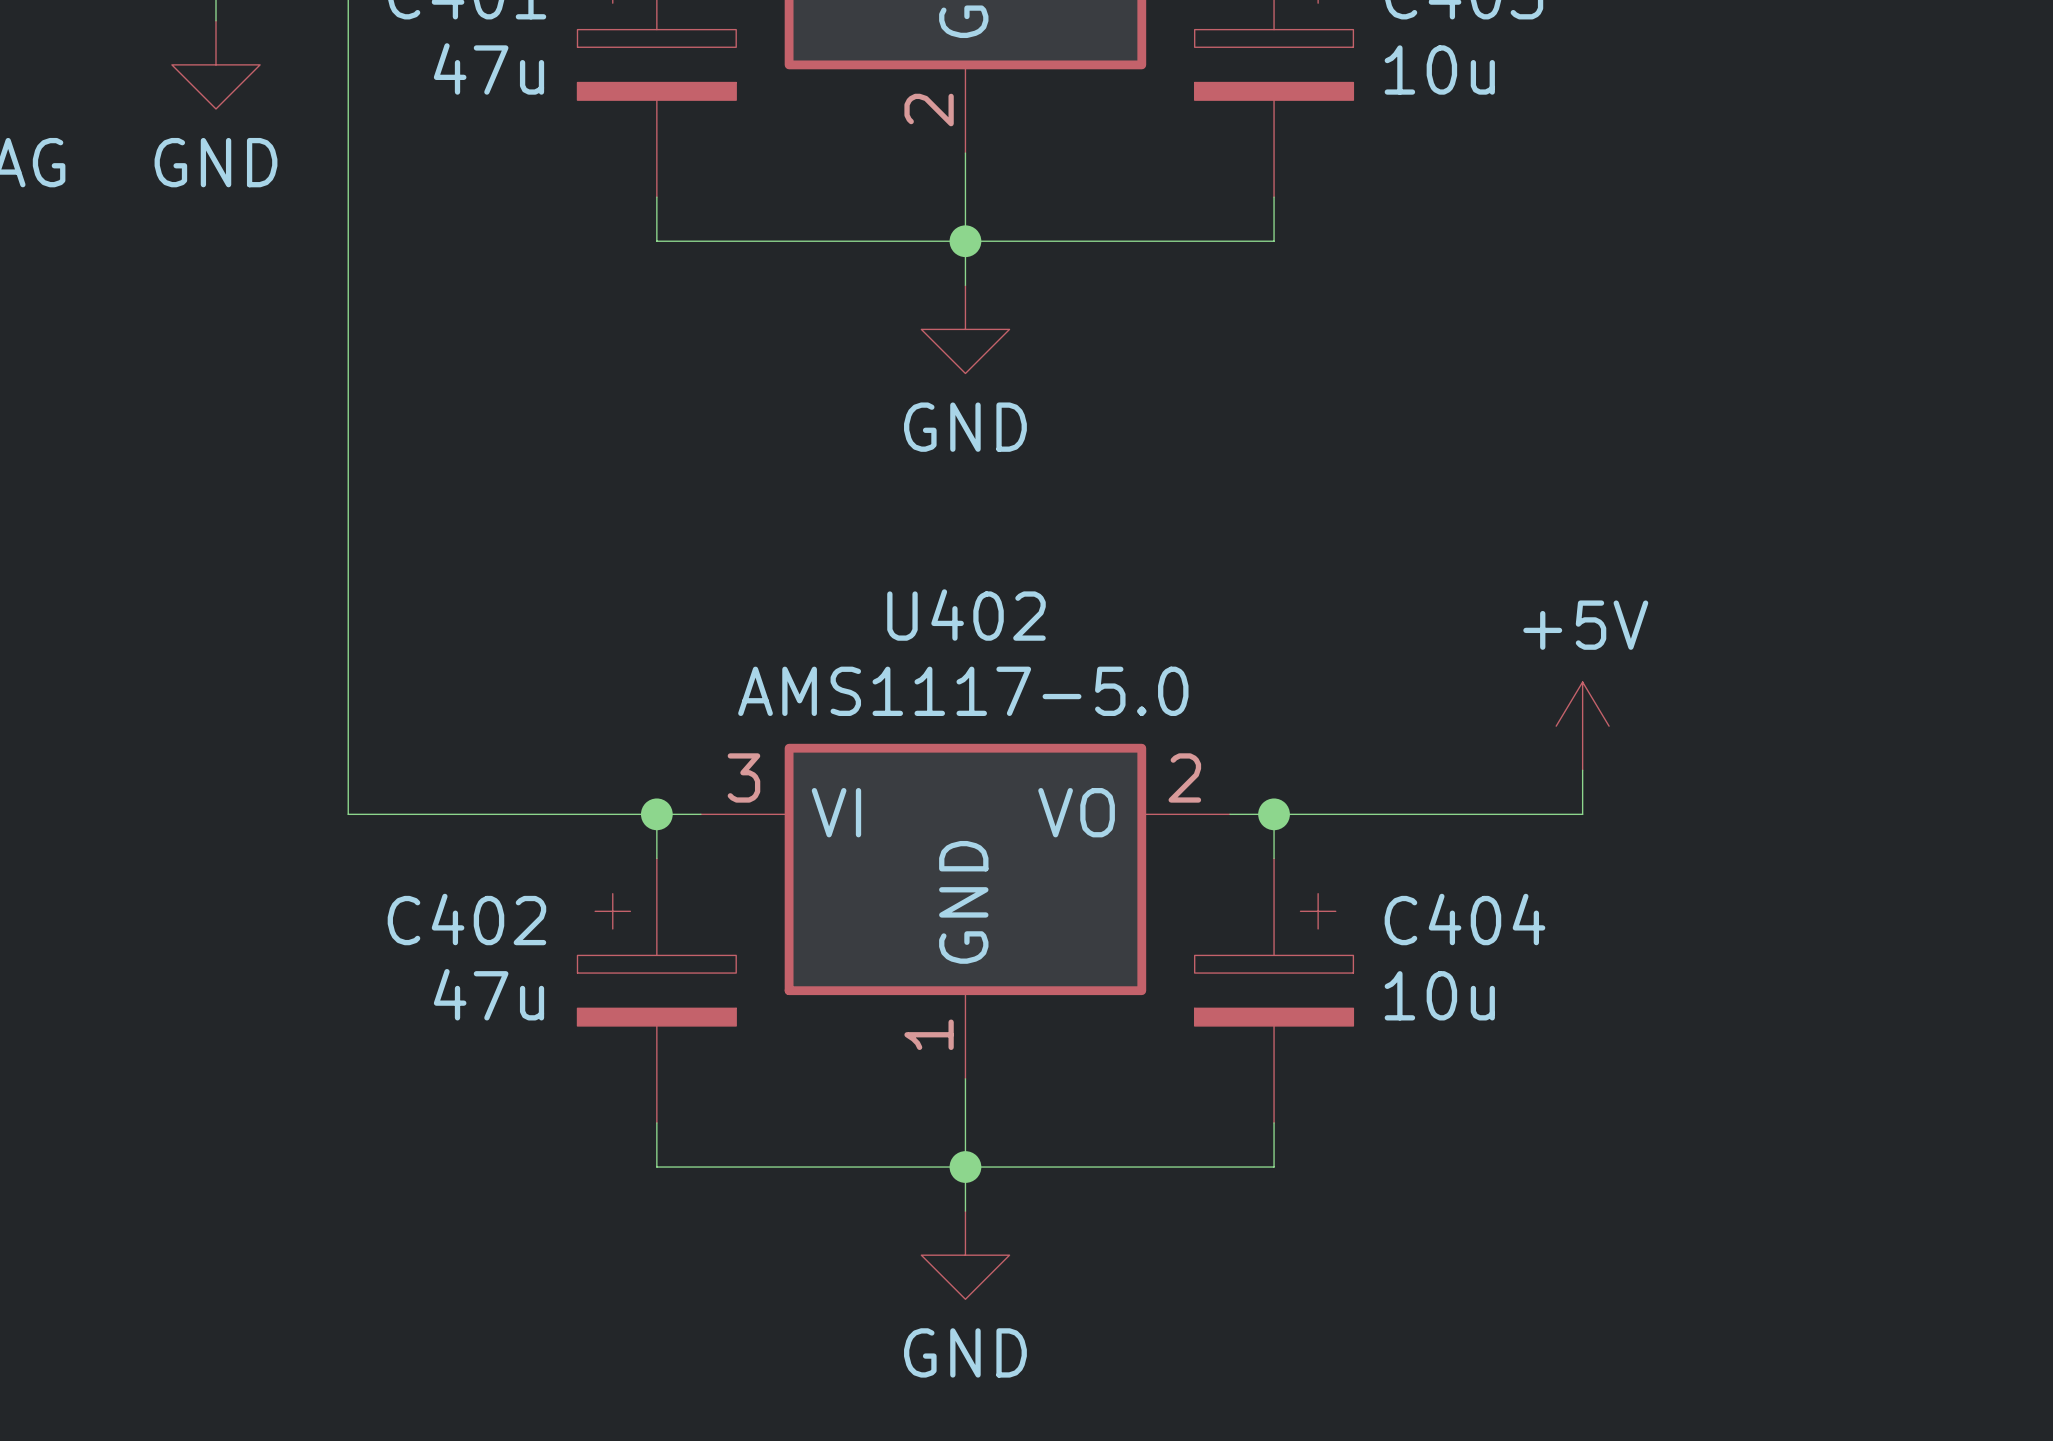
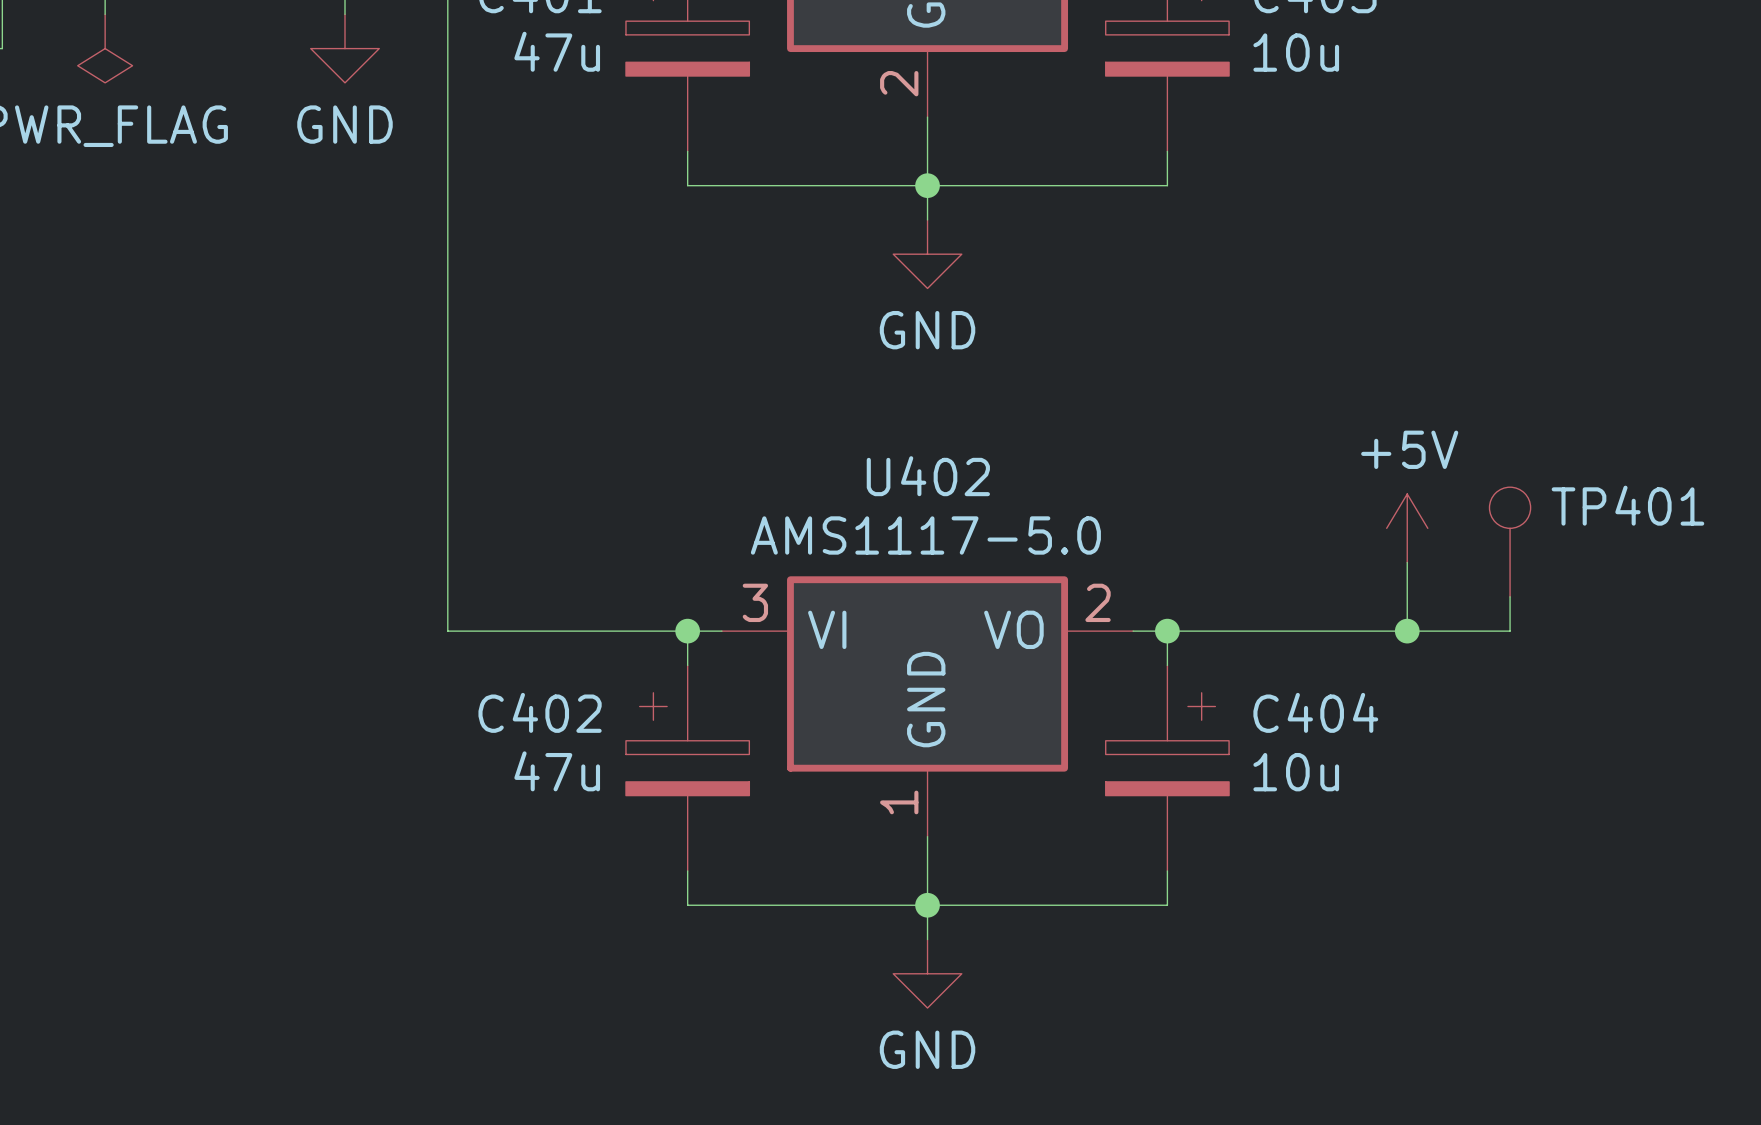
TP401: none -> (1510, 542)
power symbol position: +5V (1582, 726) -> +5V (1407, 528)
wire: none -> (1510, 596) (1510, 631) (1407, 631)
junction: none -> (1407, 631)

